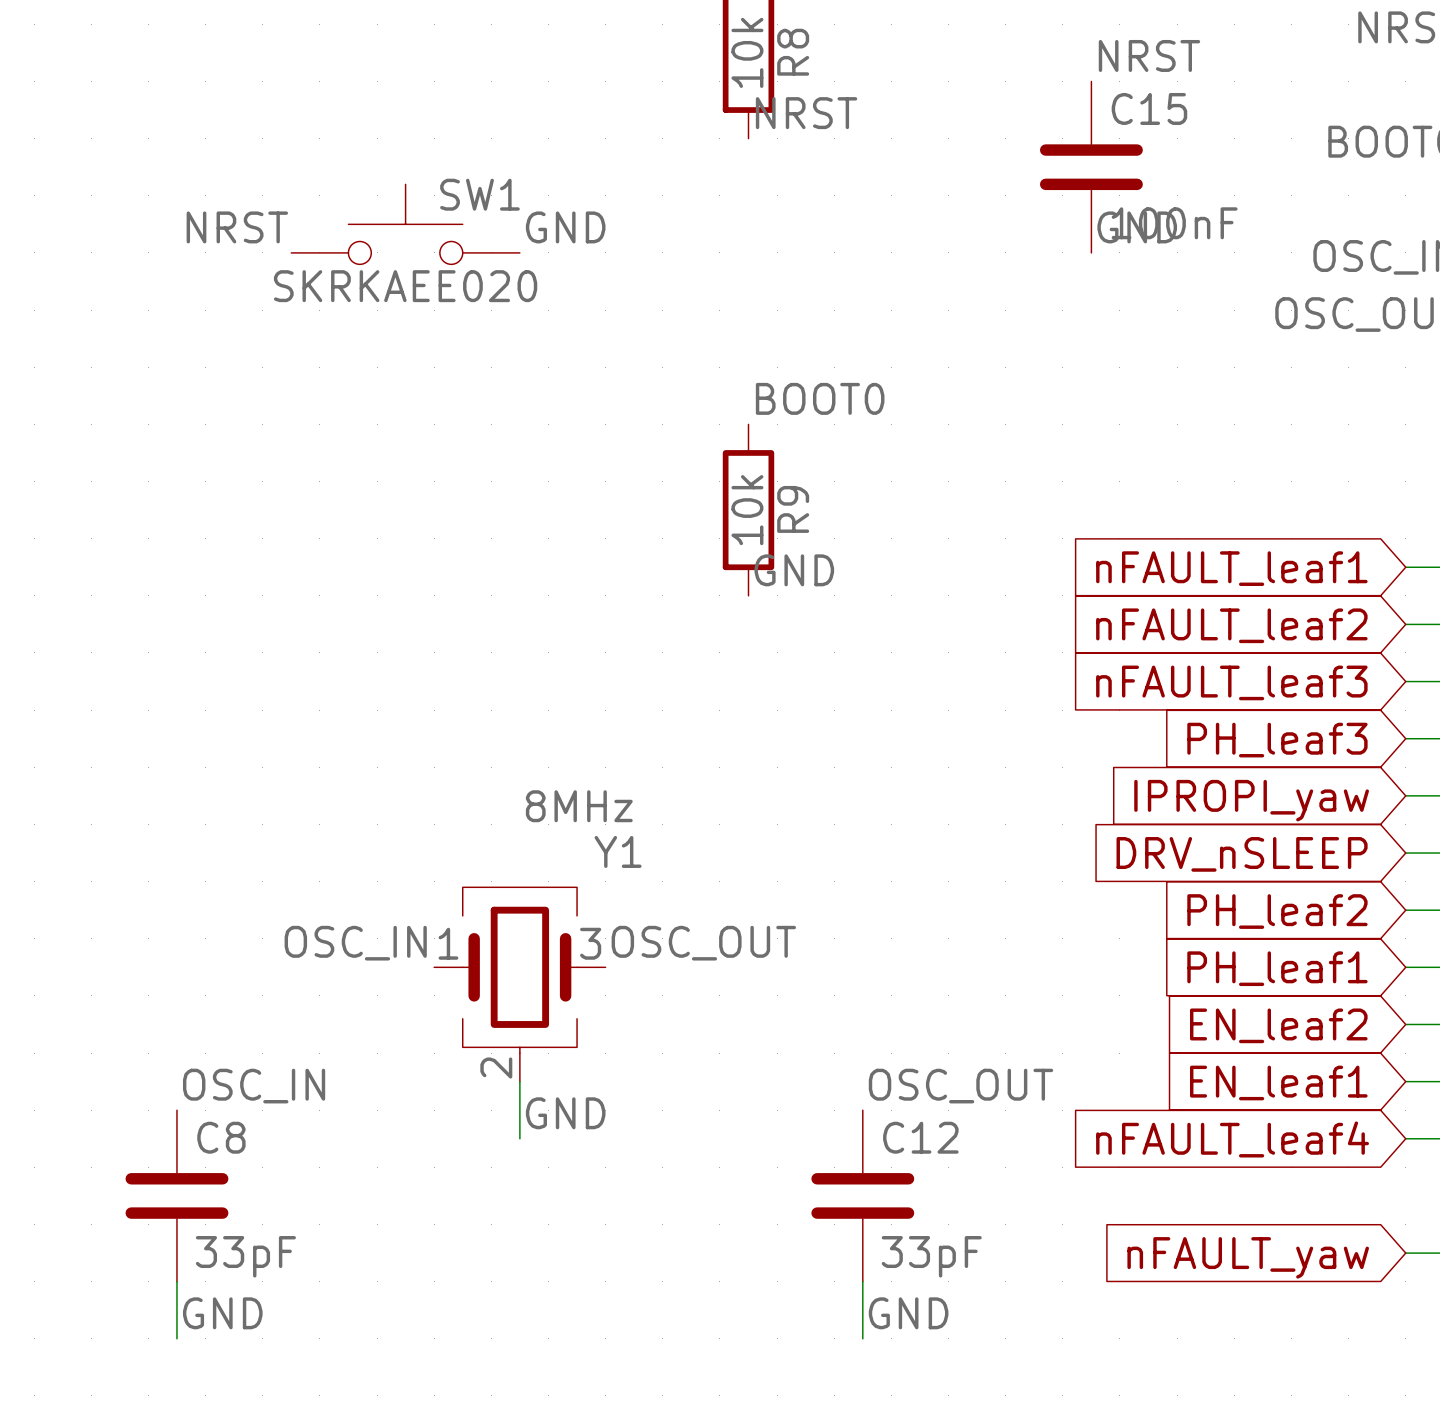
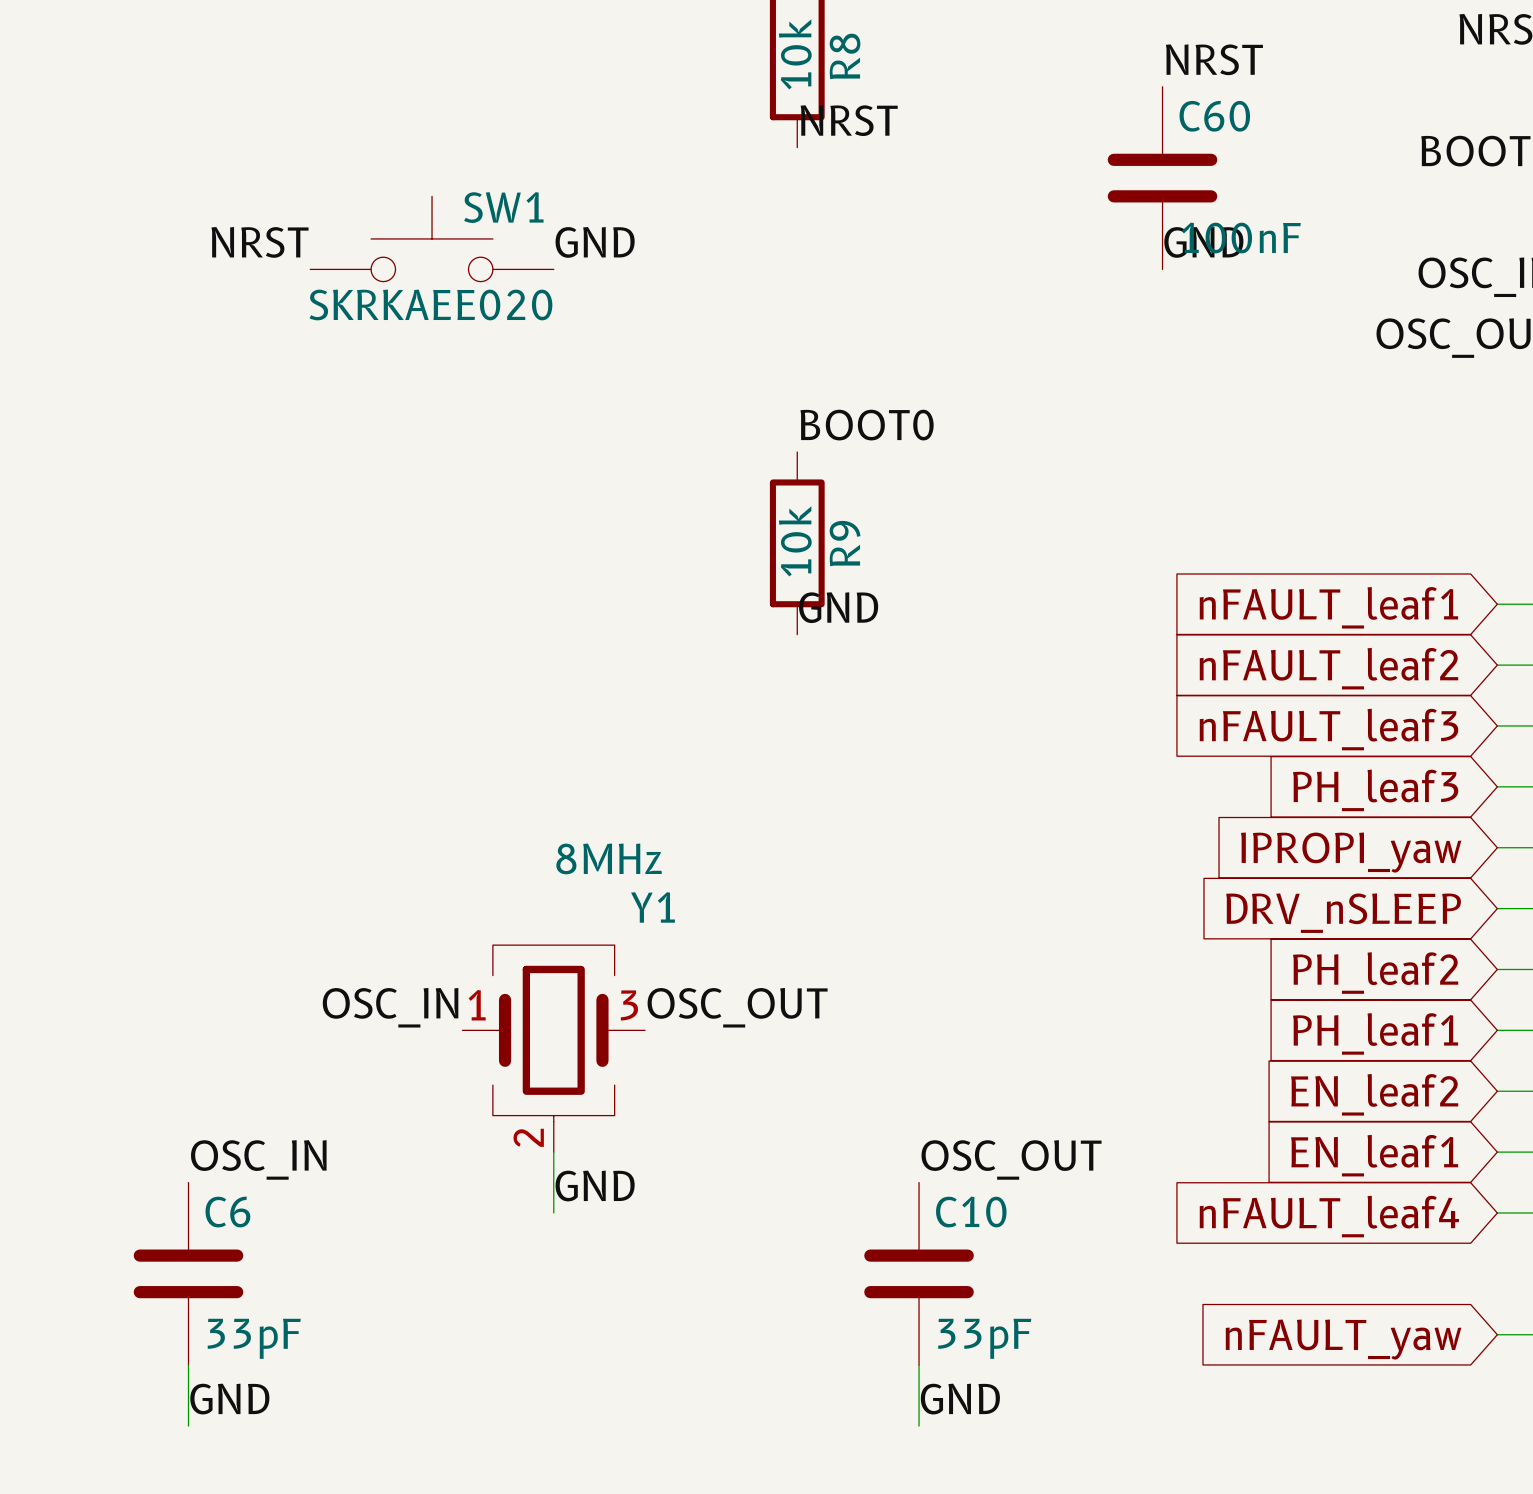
C15 name: C15 (1149, 108) -> C60 (1214, 116)
C8 name: C8 (221, 1137) -> C6 (227, 1212)
C12 name: C12 (920, 1137) -> C10 (971, 1212)

